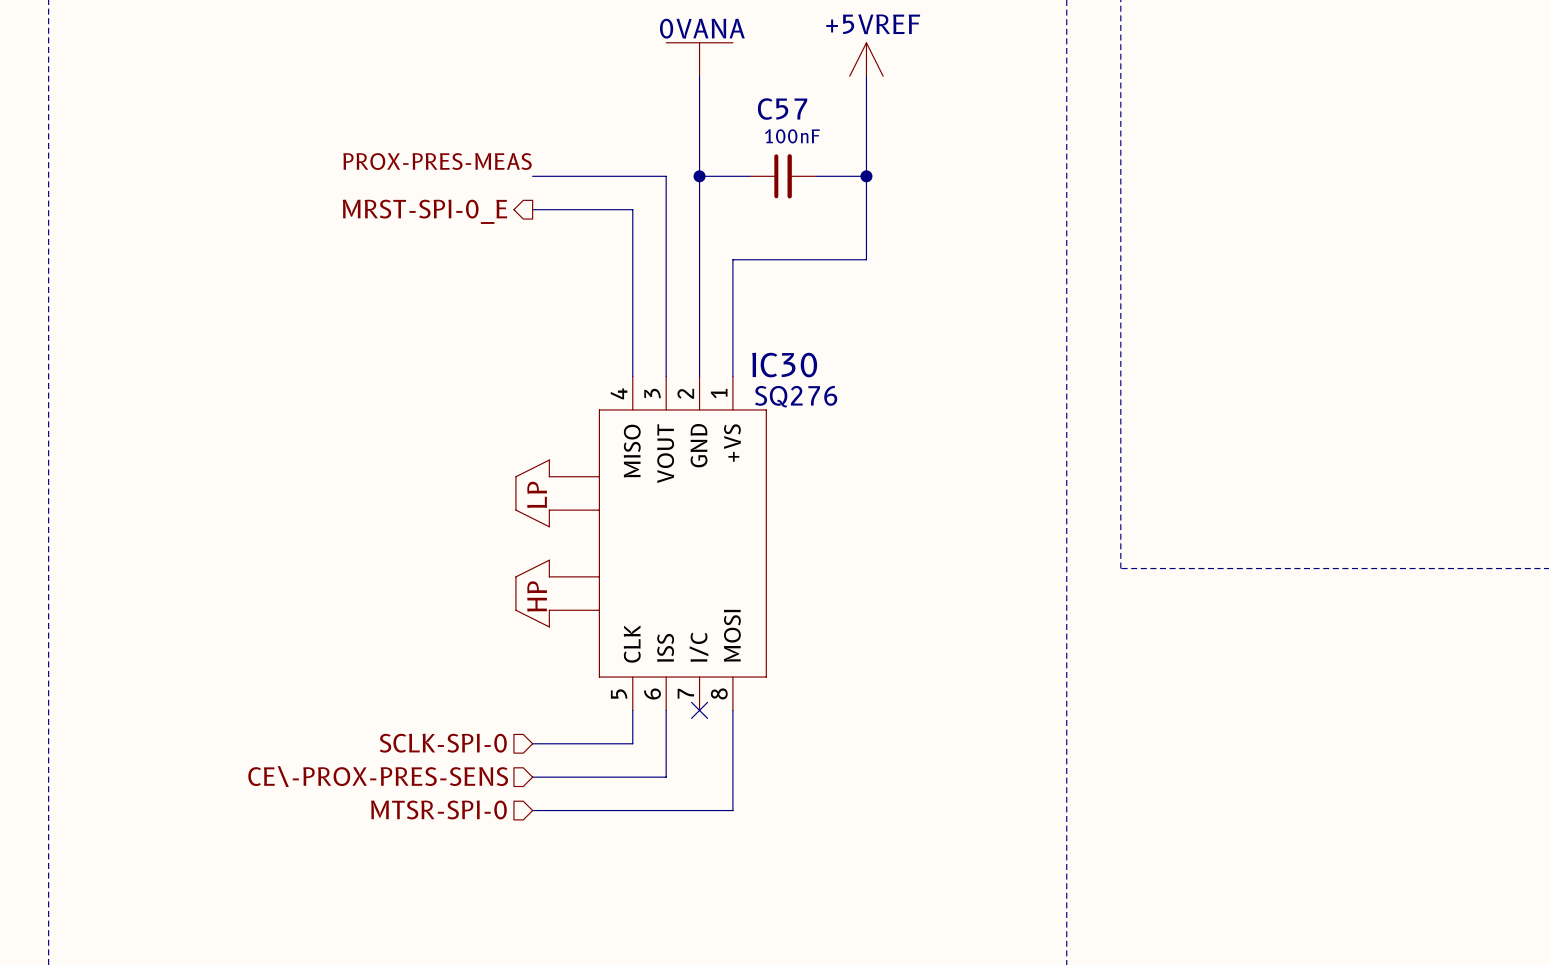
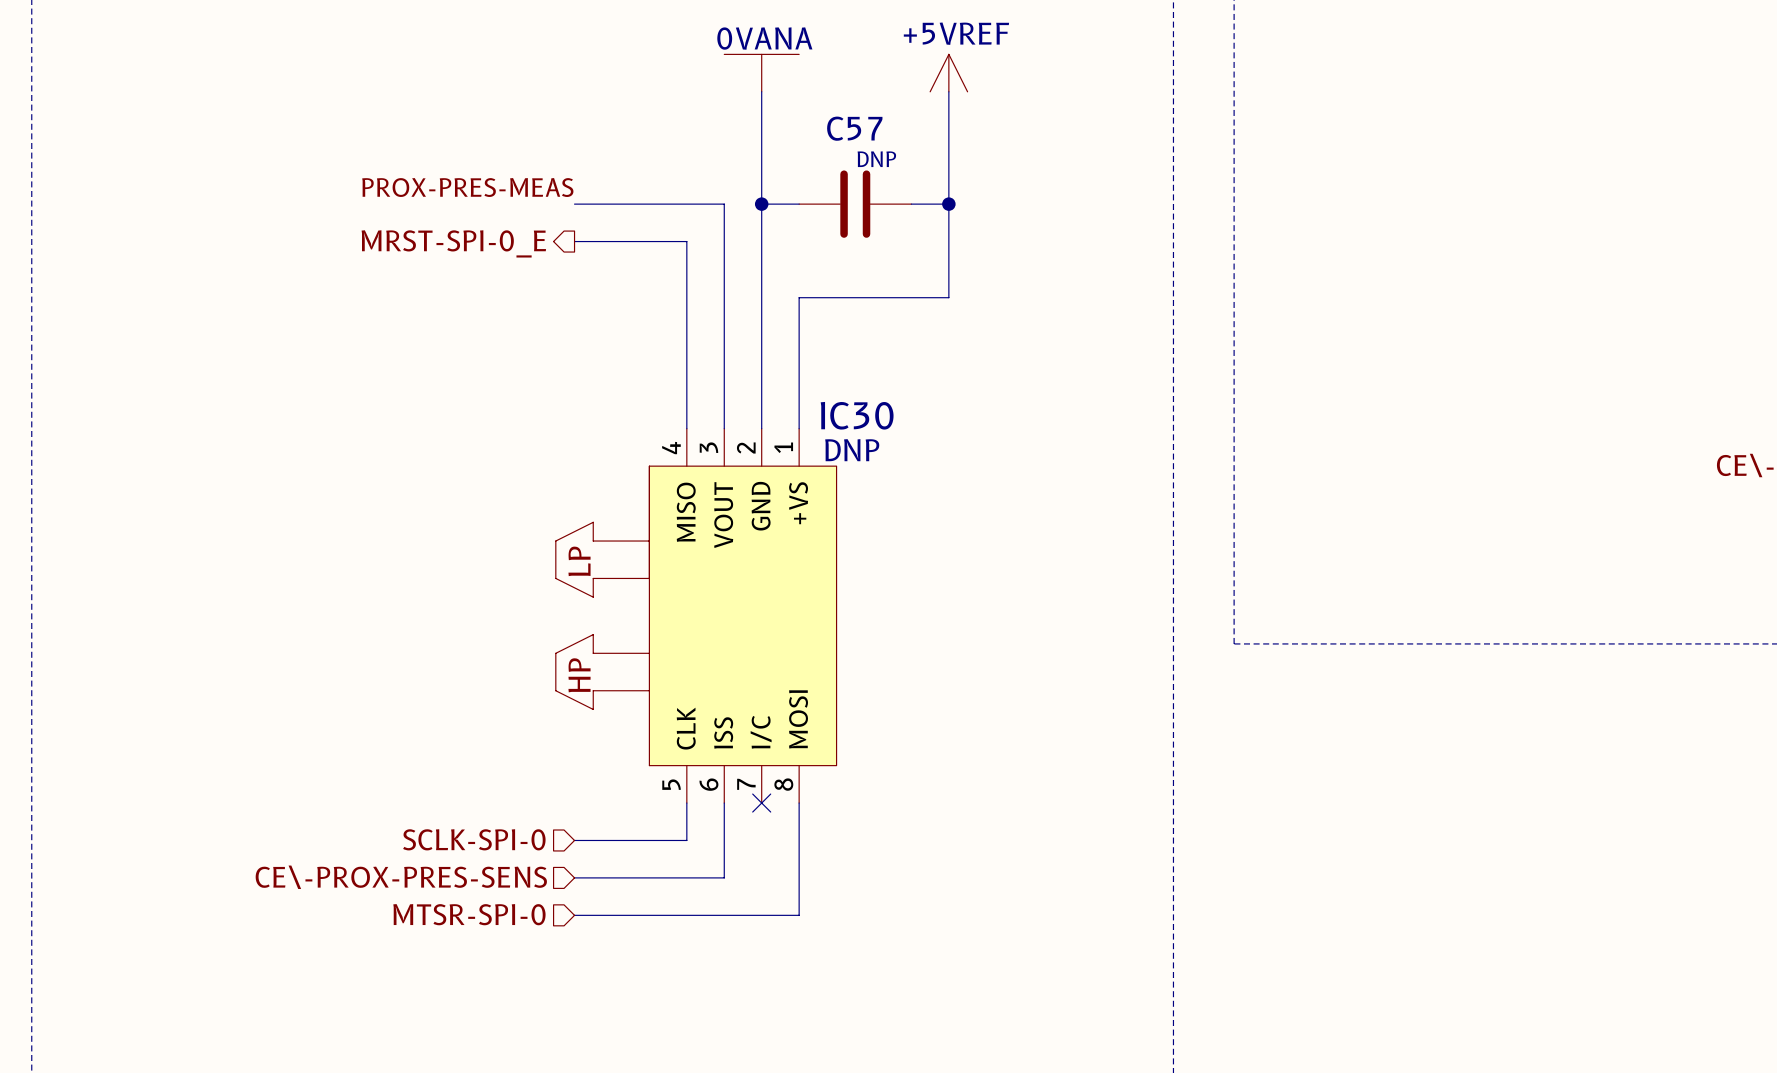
C57 value: 100nF (792, 136) -> DNP (876, 159)
C57 symbol: [749, 154, 817, 199] -> [799, 170, 912, 238]
IC30 symbol: [515, 376, 767, 711] -> [555, 428, 837, 804]
IC30 value: SQ276 (796, 396) -> DNP (852, 450)

